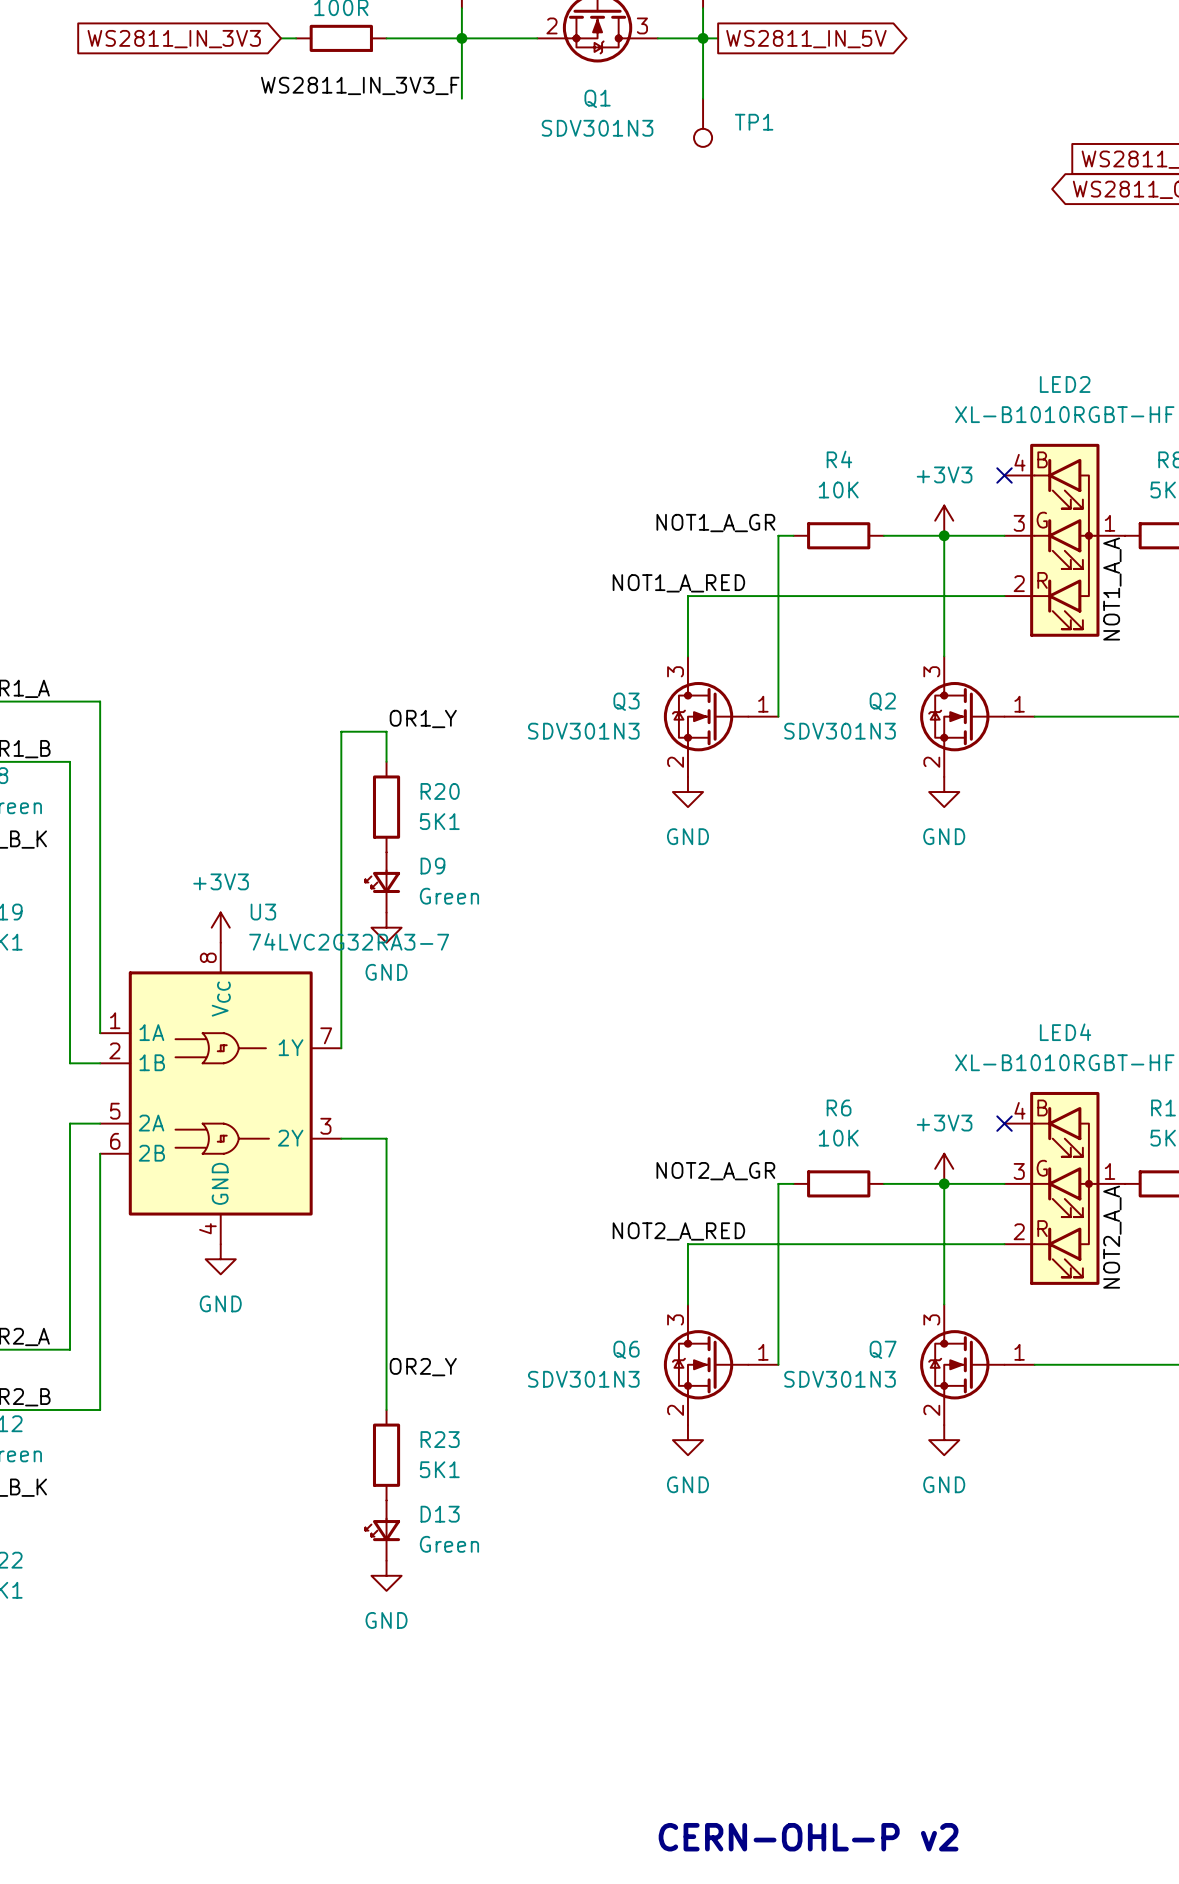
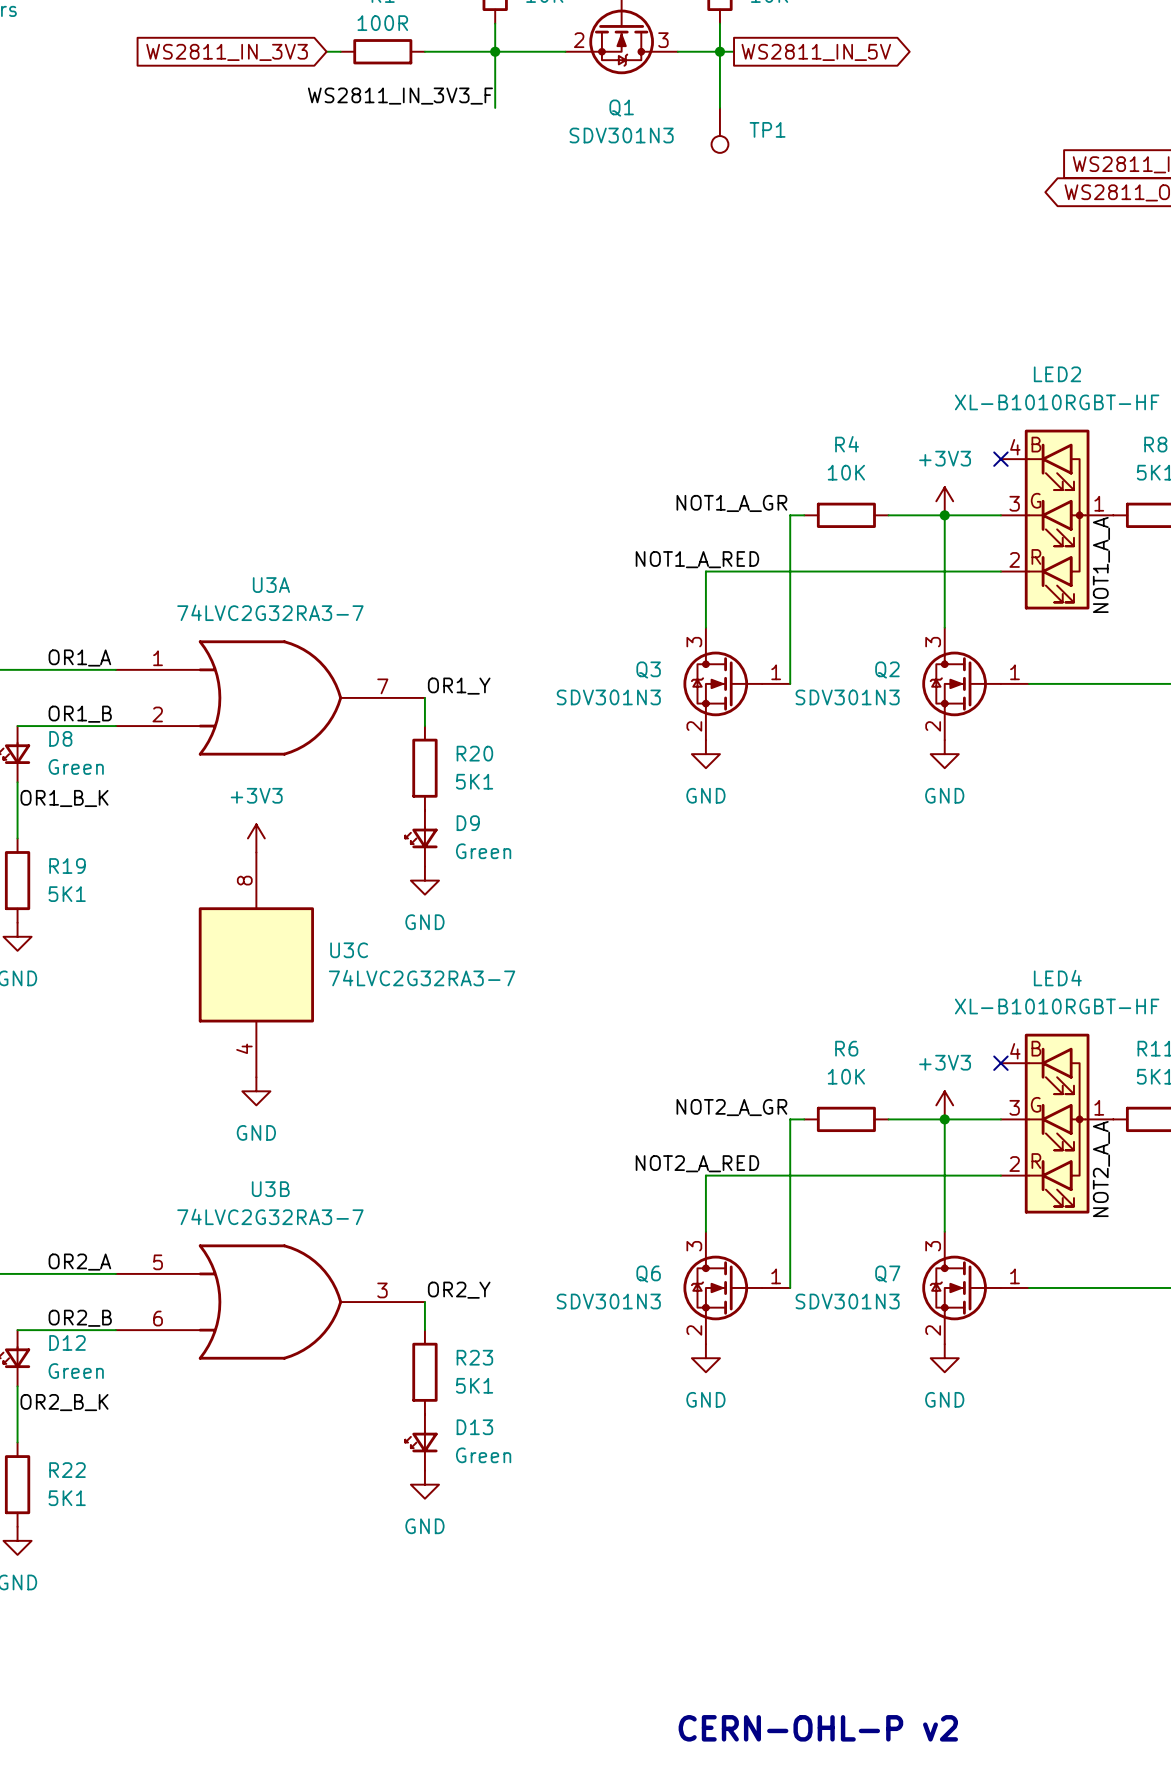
wire: (54, 701) (100, 701) (100, 1033) -> none
U3A: none -> 74LVC2G32RA3-7 (270, 697)
wire: (386, 731) (341, 731) (341, 1048) -> none
wire: (54, 761) (70, 761) (70, 1063) (100, 1063) -> none
power symbol position: +3V3 (220, 927) -> +3V3 (256, 838)
U3C: none -> 74LVC2G32RA3-7 (256, 964)
U3: 74LVC2G32RA3-7 (220, 1093) -> none
wire: (100, 1123) (70, 1123) (70, 1349) (54, 1349) -> none
wire: (341, 1138) (386, 1138) (386, 1379) -> none
wire: (100, 1153) (100, 1409) (54, 1409) -> none
power symbol position: GND (220, 1259) -> GND (256, 1091)
U3B: none -> 74LVC2G32RA3-7 (270, 1302)

